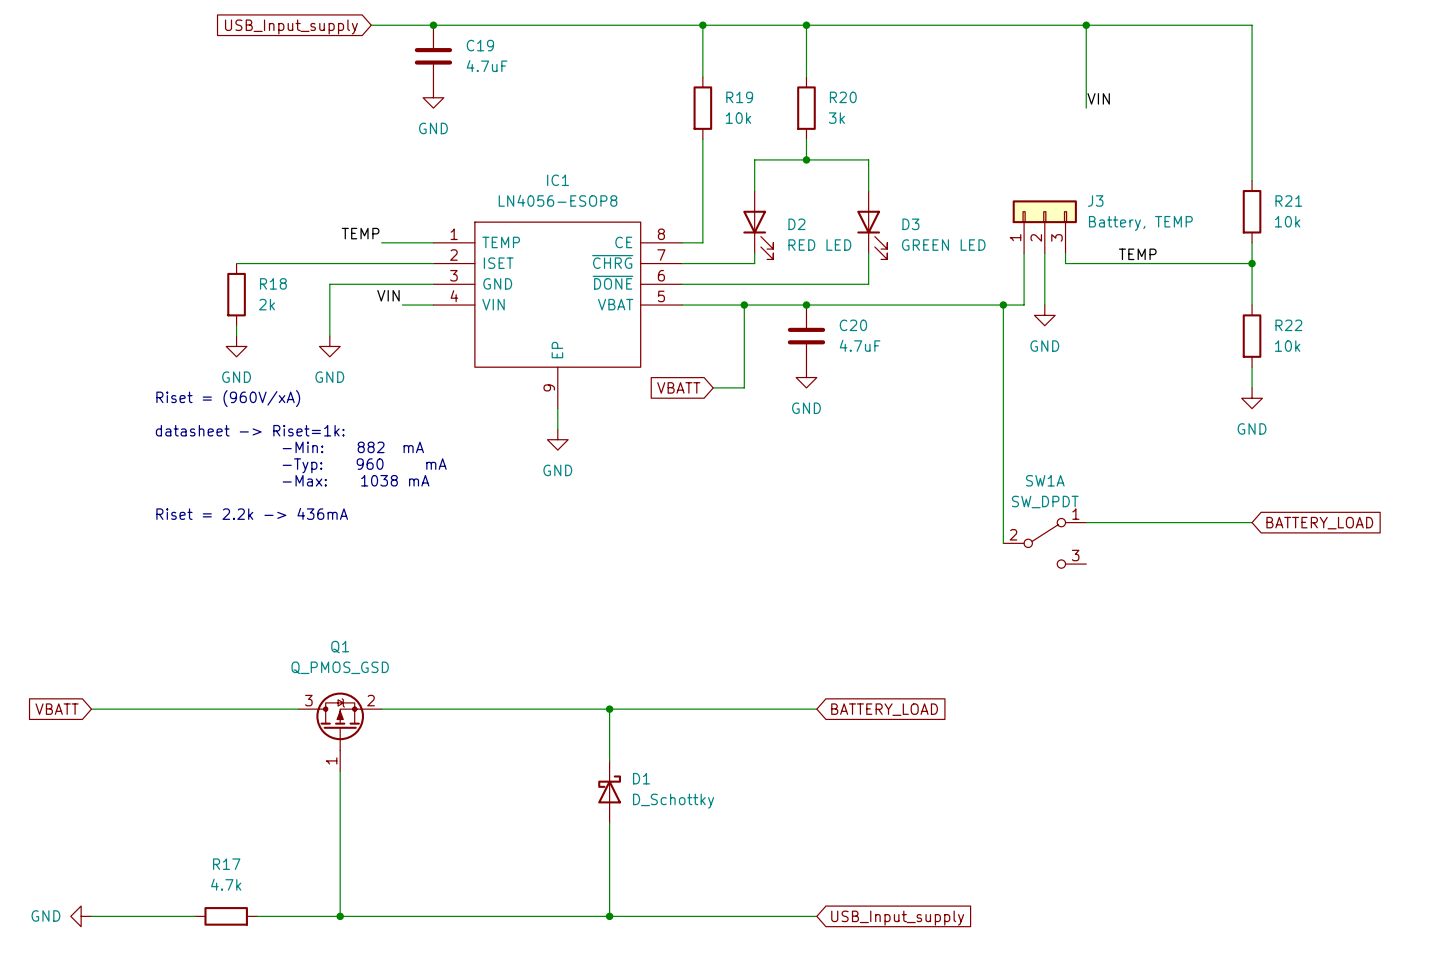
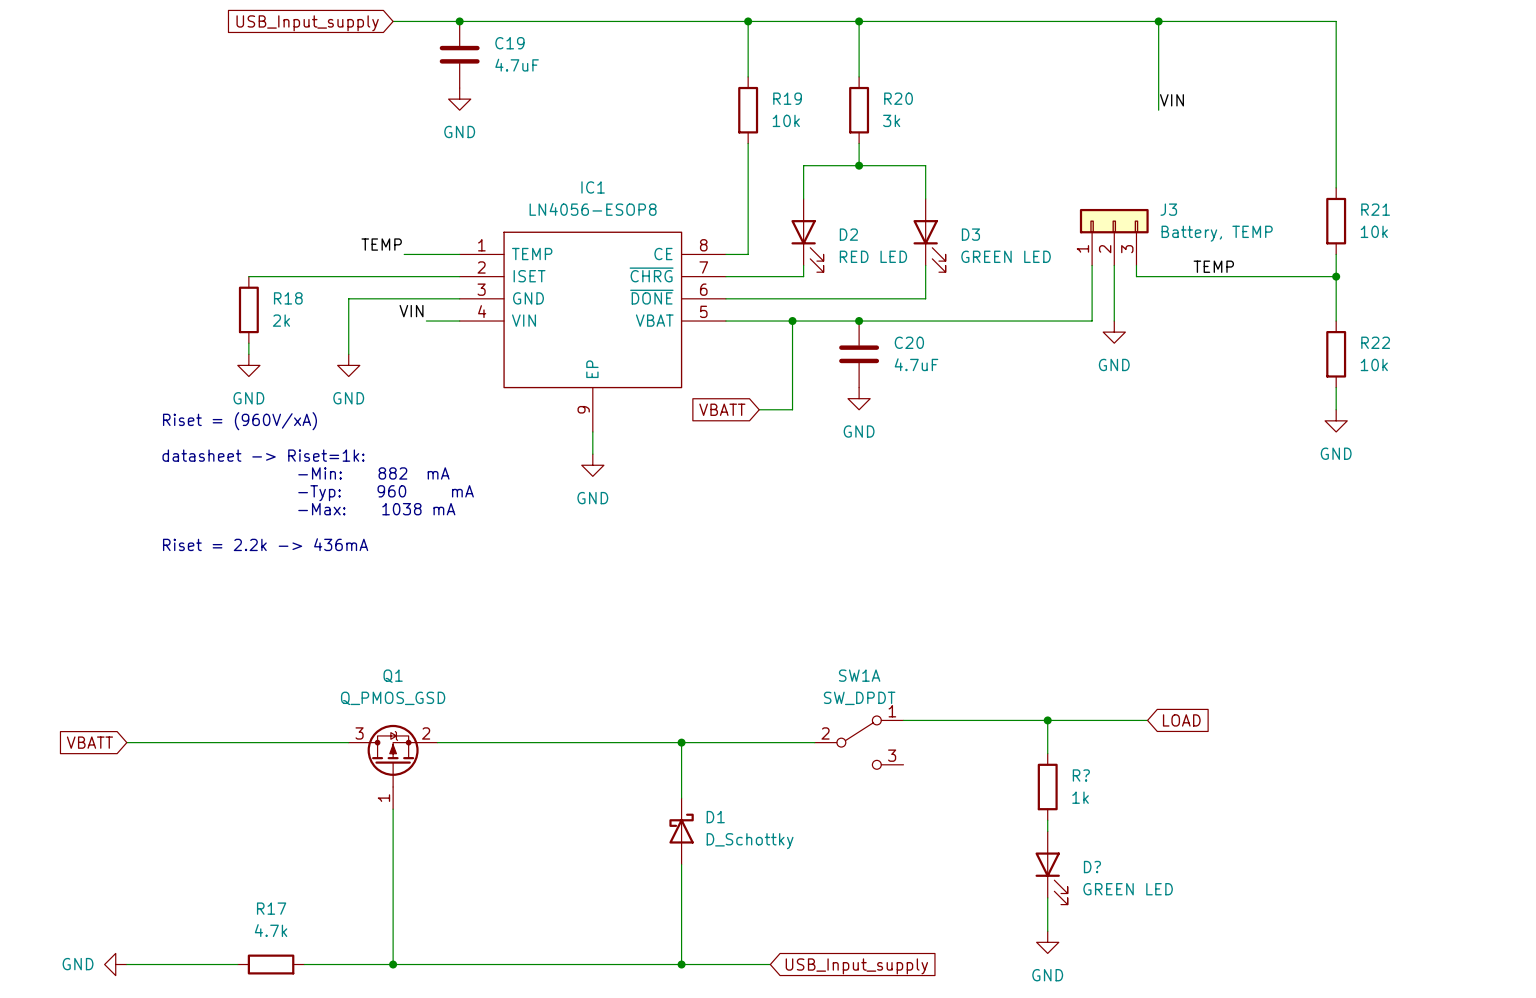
wire: (1003, 305) (1003, 543) -> none
junction: (1003, 305) -> none
wire: (1086, 522) (1252, 522) -> none
global label: BATTERY_LOAD (1319, 523) -> none
SW1A position: (1044, 543) -> (859, 742)
wire: none -> (903, 720) (1147, 720)
wire: none -> (1047, 720) (1047, 753)
junction: none -> (1047, 720)
global label: none -> LOAD (1181, 720)
wire: none -> (437, 742) (814, 742)
global label position: VBATT (57, 709) -> VBATT (89, 742)
wire: (91, 709) (298, 709) -> (126, 742) (348, 742)
wire: (381, 709) (816, 709) -> none
wire: (609, 709) (609, 760) -> (681, 742) (681, 798)
junction position: (609, 709) -> (681, 742)
global label: BATTERY_LOAD (884, 709) -> none
Q1 position: (340, 731) -> (393, 767)
R?: none -> 1k (1047, 787)
wire: (340, 771) (340, 916) -> (393, 809) (393, 964)
wire: none -> (1047, 820) (1047, 831)
D1 position: (609, 792) -> (681, 831)
D?: none -> GREEN LED (1051, 867)
wire: (609, 823) (609, 916) -> (681, 864) (681, 964)
wire: none -> (1047, 897) (1047, 931)
power symbol: none -> GND (1047, 942)
wire: none -> (304, 964) (770, 964)
power symbol position: GND (81, 916) -> GND (115, 964)
wire: (91, 916) (195, 916) -> (126, 964) (237, 964)
R17 position: (226, 916) -> (271, 964)
wire: (257, 916) (816, 916) -> none
junction position: (340, 916) -> (393, 964)
junction position: (609, 916) -> (681, 964)
global label position: USB_Input_supply (897, 918) -> USB_Input_supply (856, 966)

